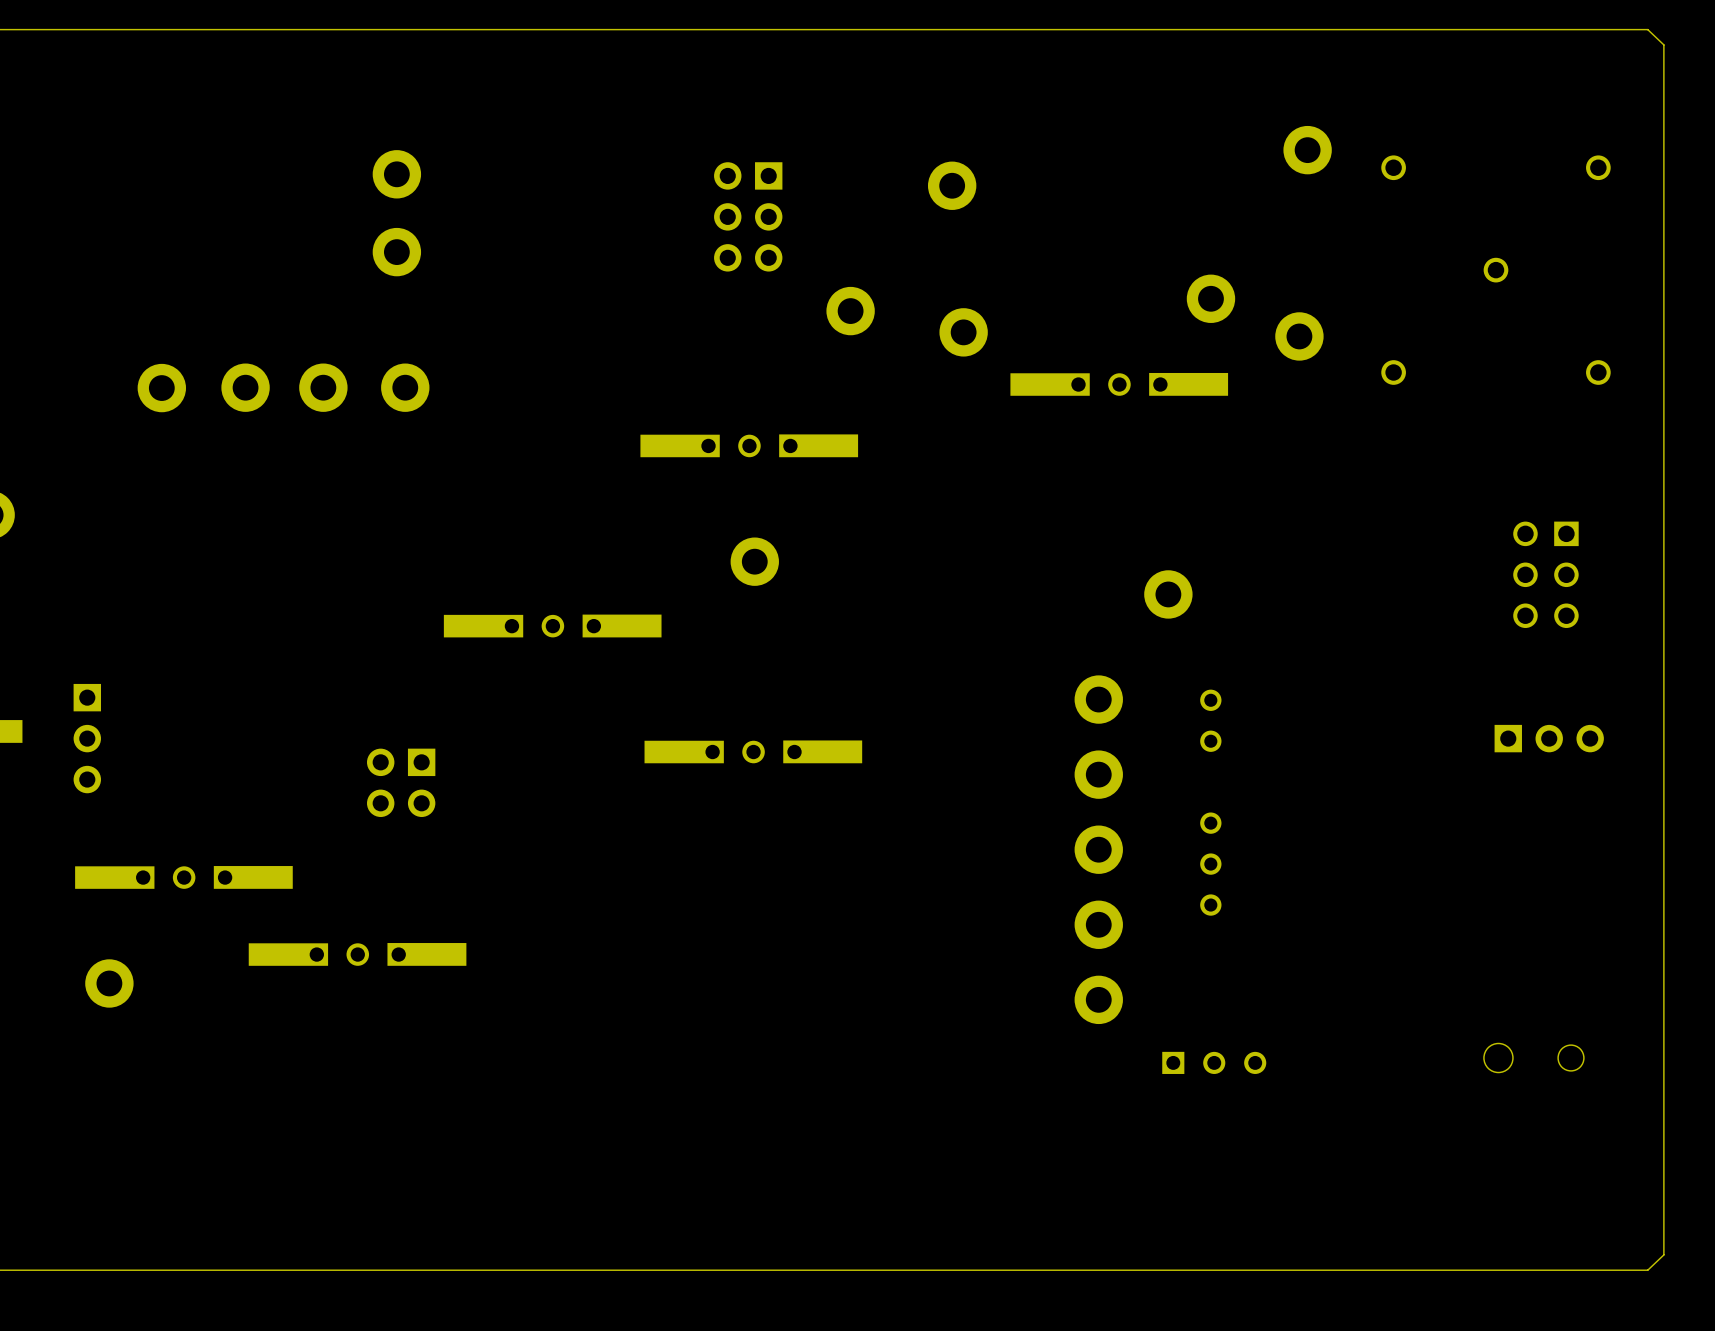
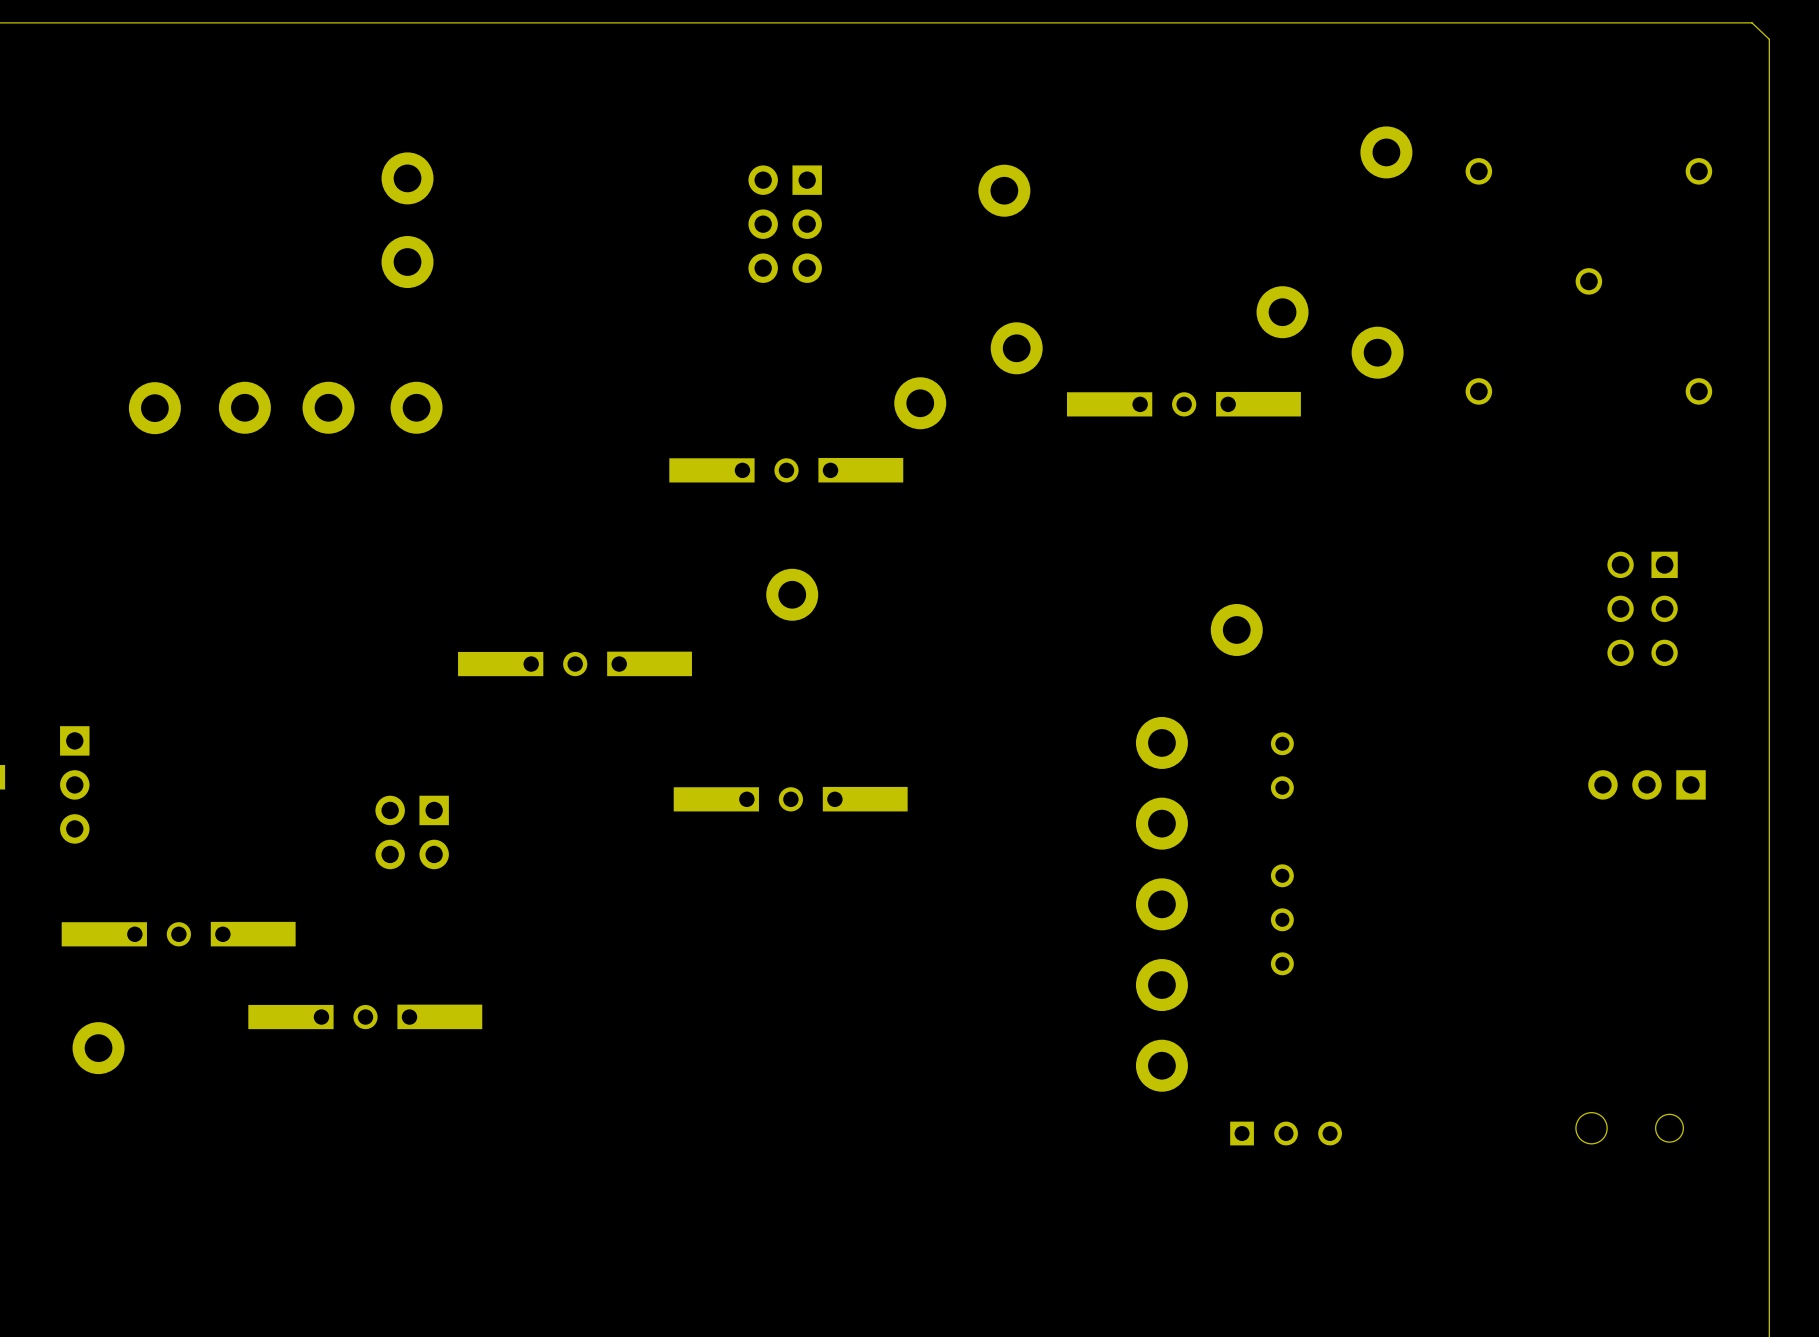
part position: (850, 311) -> (920, 403)
part rotation: 0° (1549, 738) -> 180° (1646, 784)

